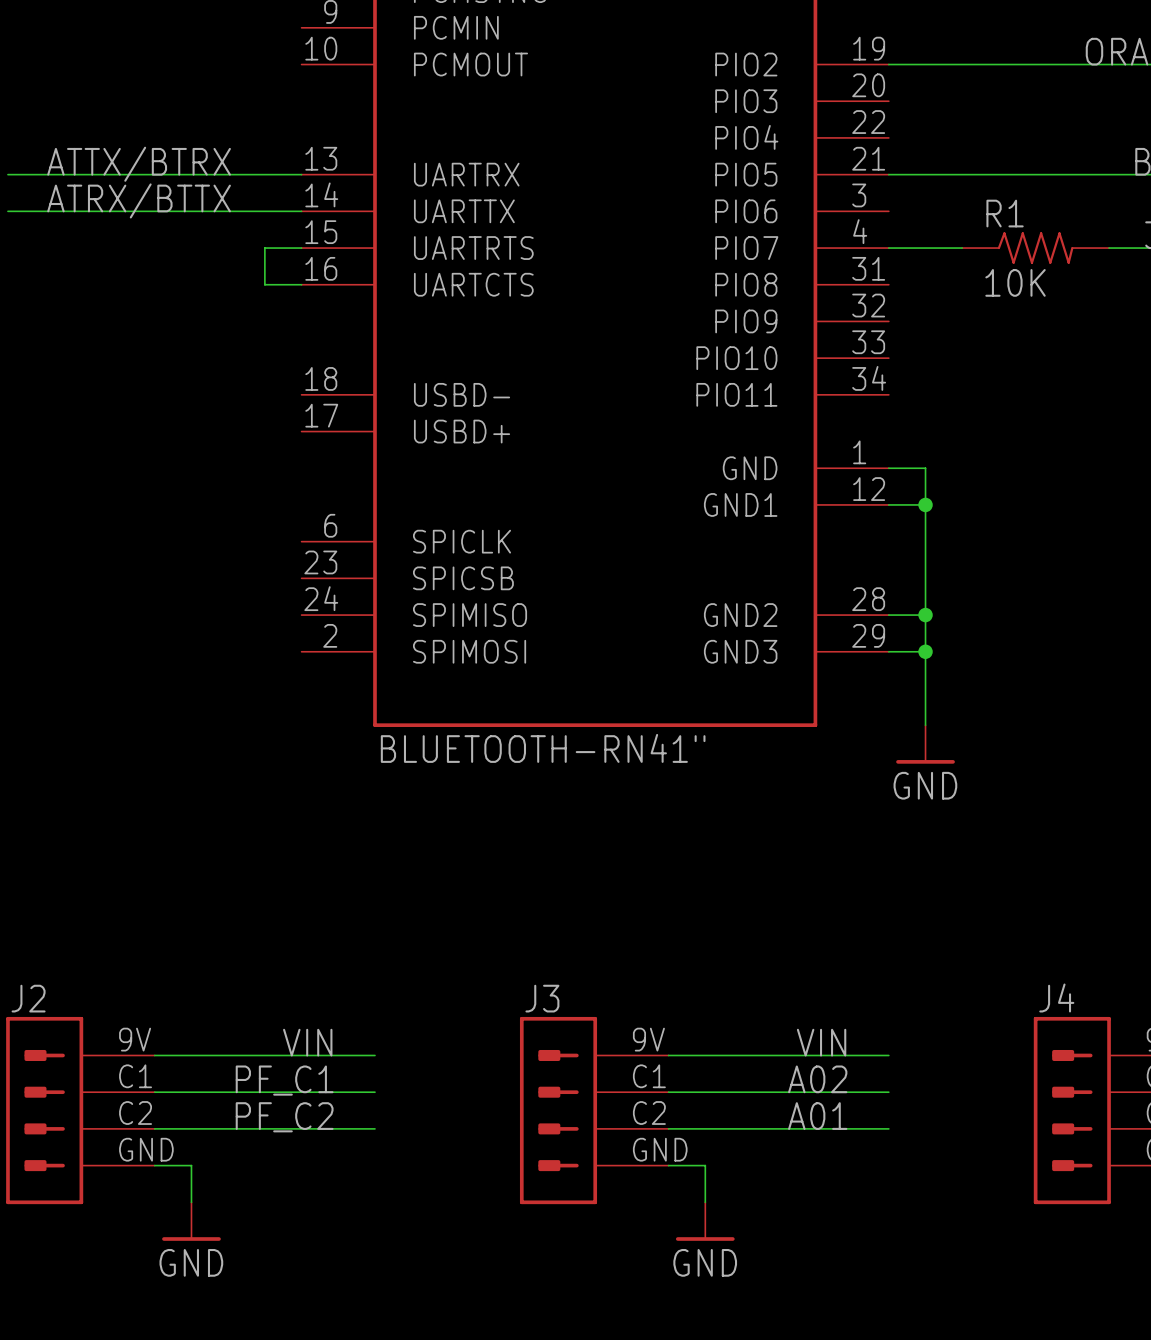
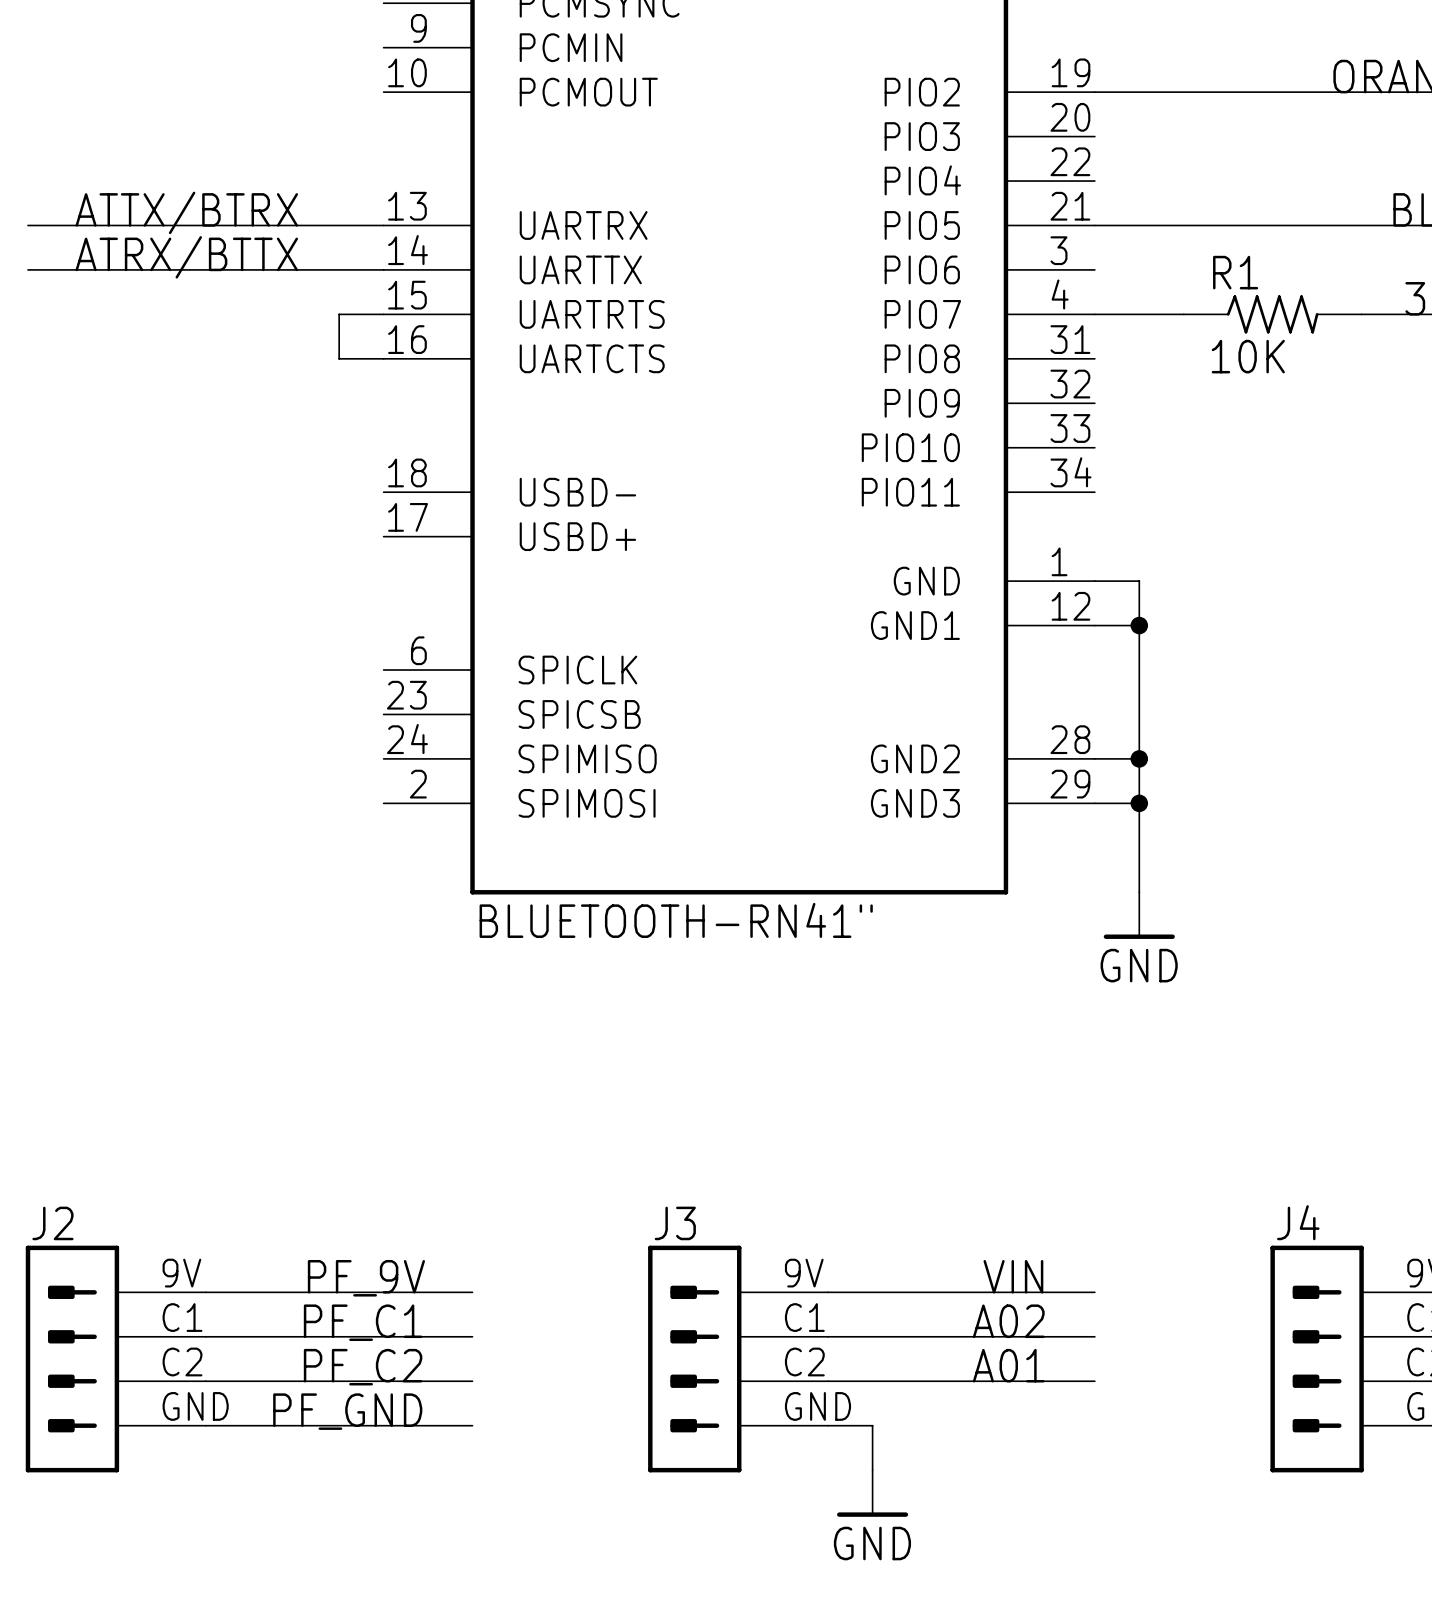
label: VIN (307, 1042) -> PF_9V (366, 1278)
label: none -> PF_GND (347, 1411)
wire: (191, 1165) (191, 1202) -> (250, 1425) (472, 1425)
power symbol: GND (191, 1221) -> none

